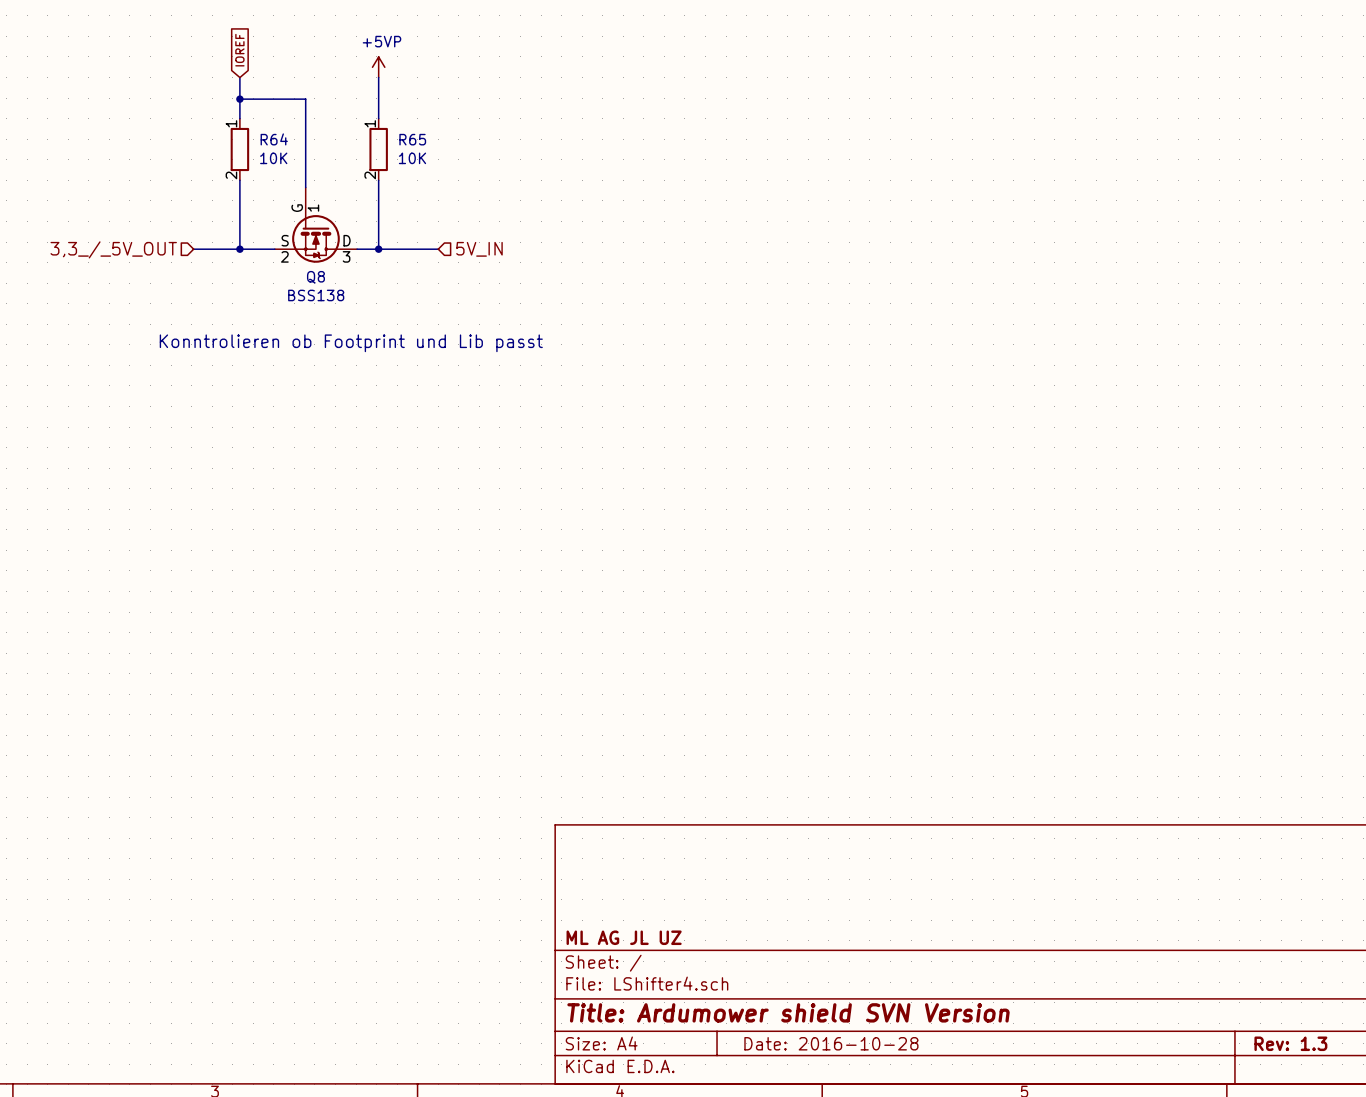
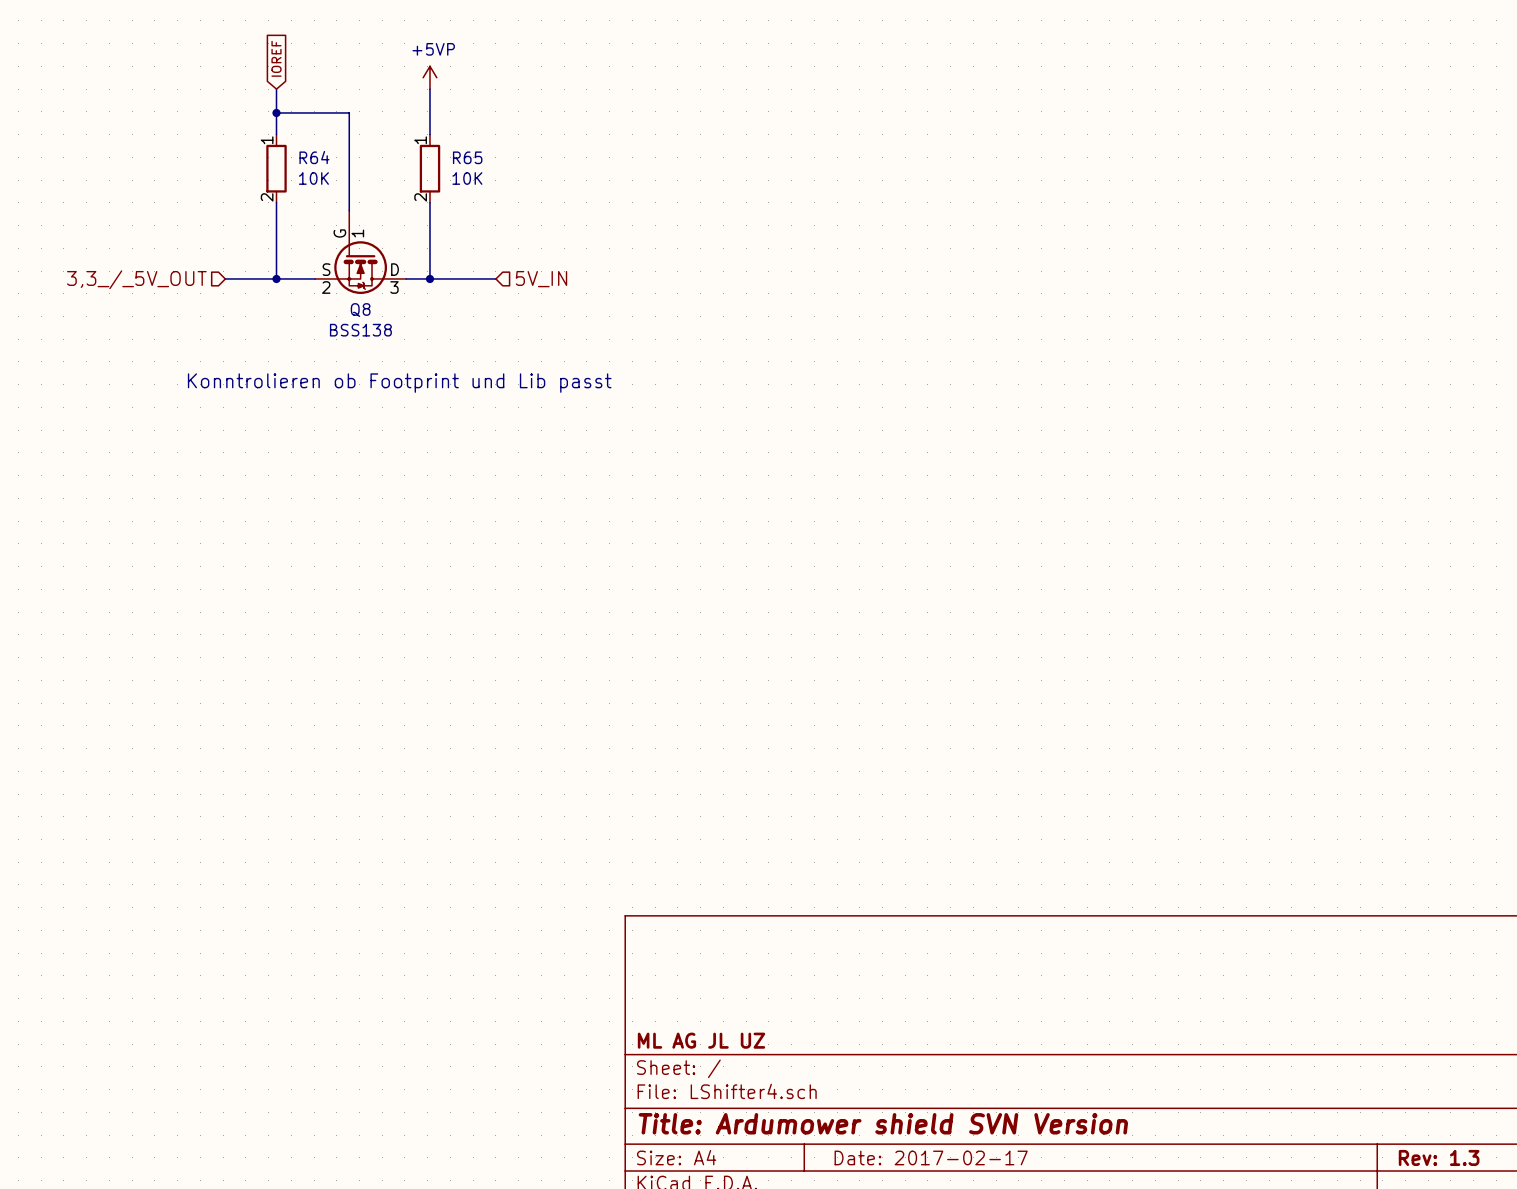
title block: Date: 2016-10-28 (831, 1043) -> Date: 2017-02-17 (931, 1157)

